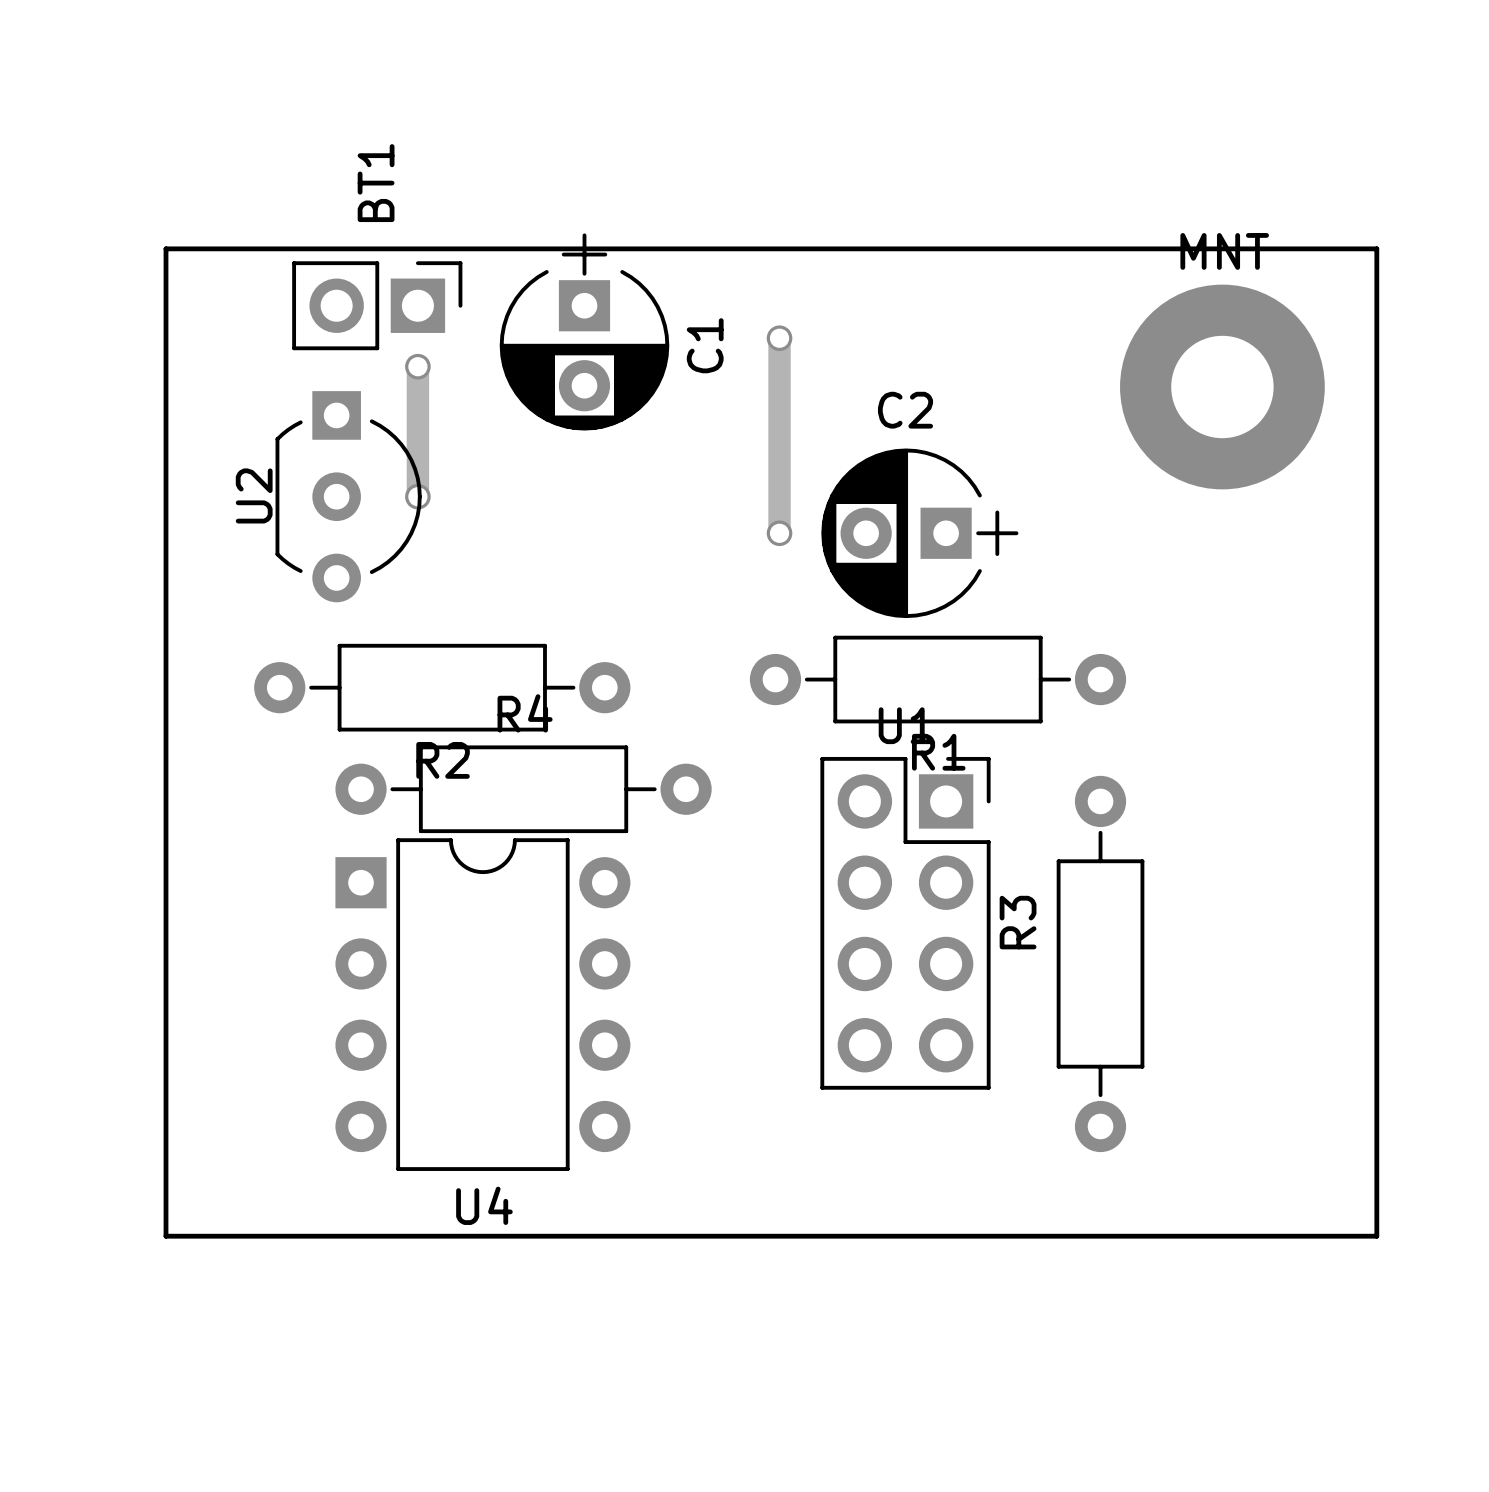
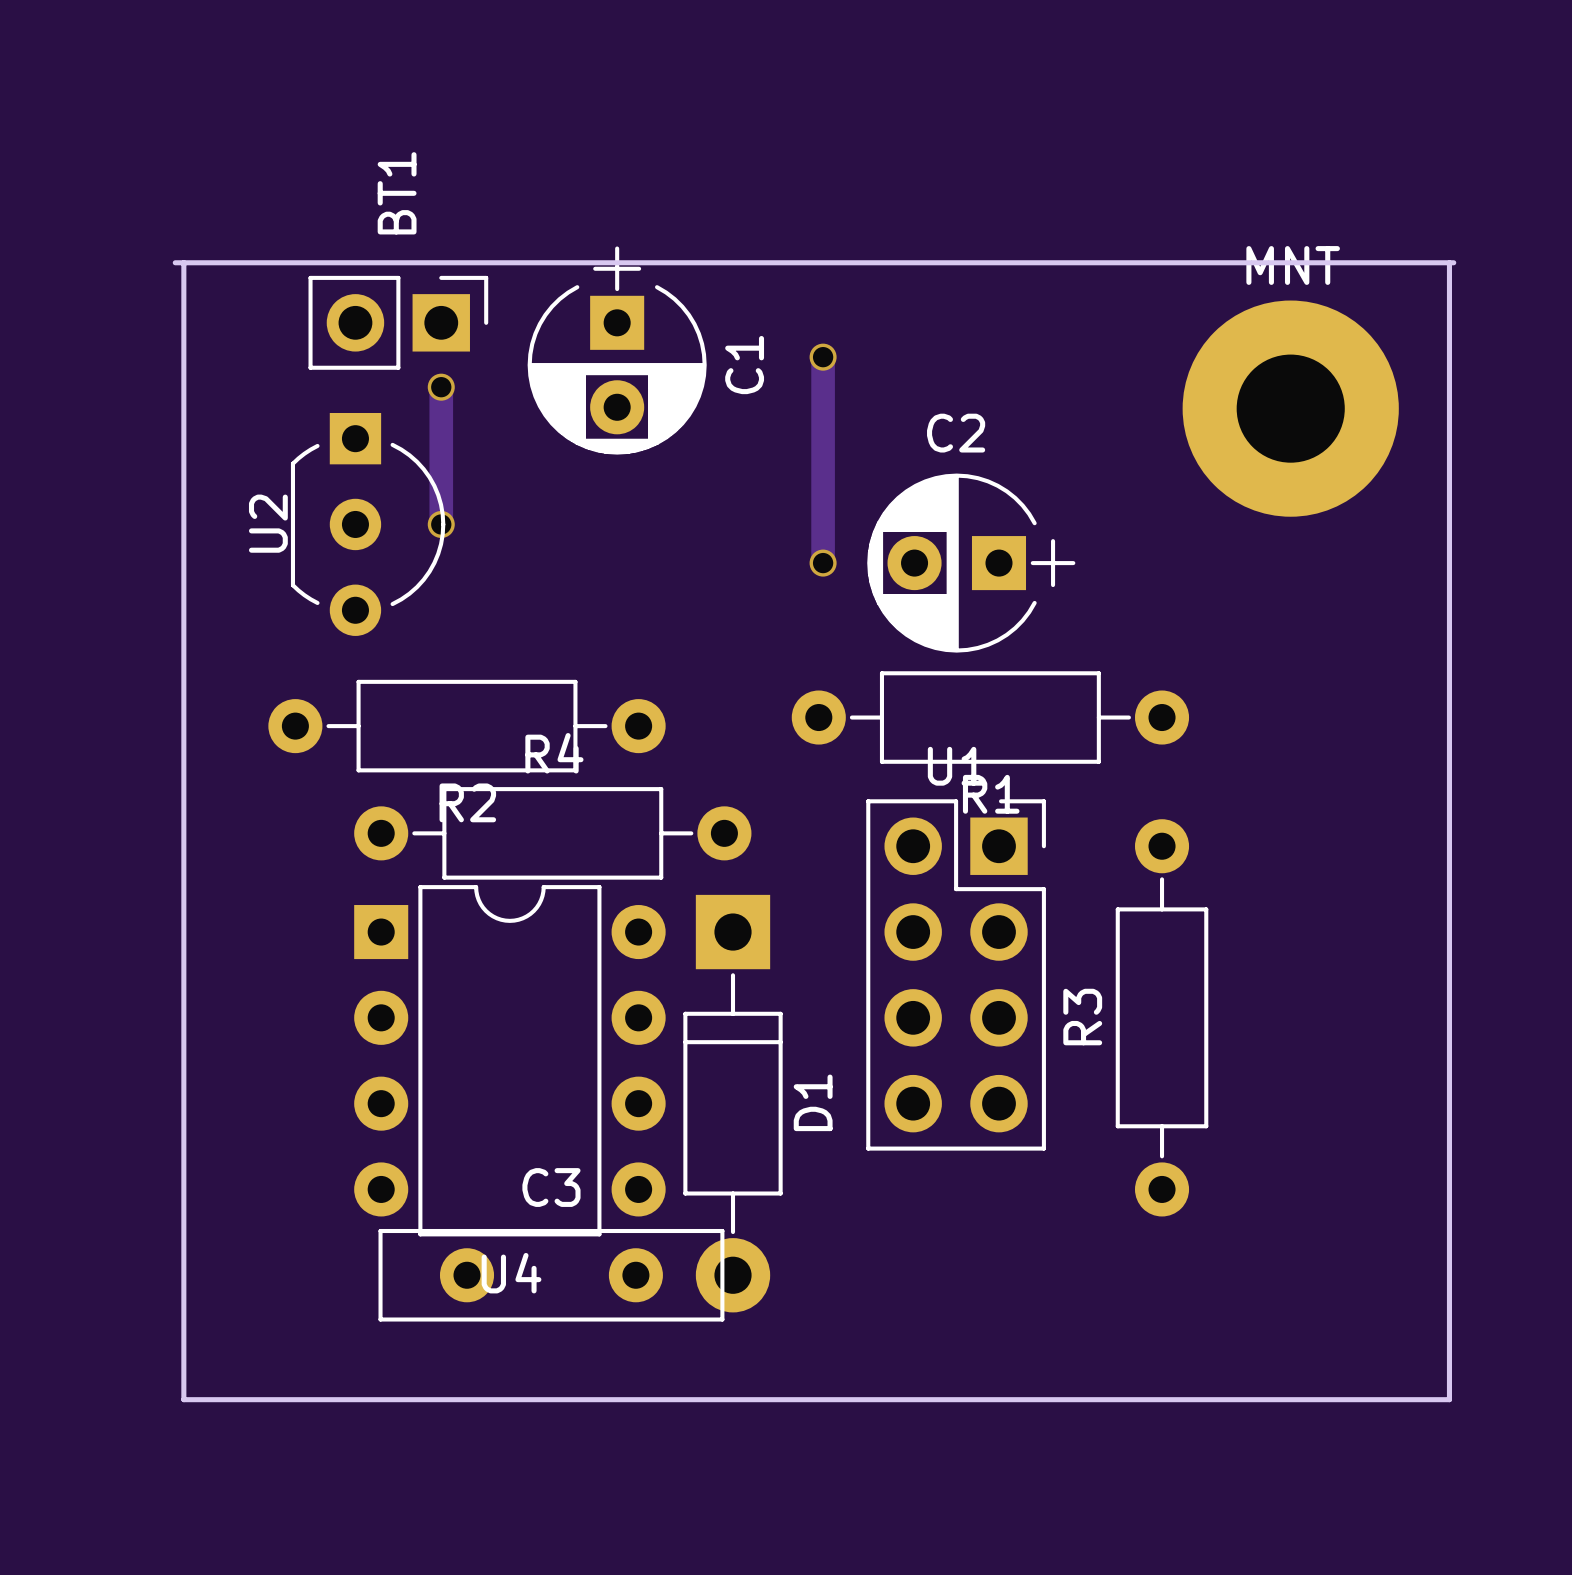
board edge: (165, 248) (165, 1236) (1376, 1236) (1376, 248) -> none
board edge: none -> (183, 262) (183, 1399) (1449, 1399) (1449, 262)
R3 name position: R3 (1018, 922) -> R3 (1082, 1017)
D1: none -> (733, 1103)
C3: none -> (551, 1275)

